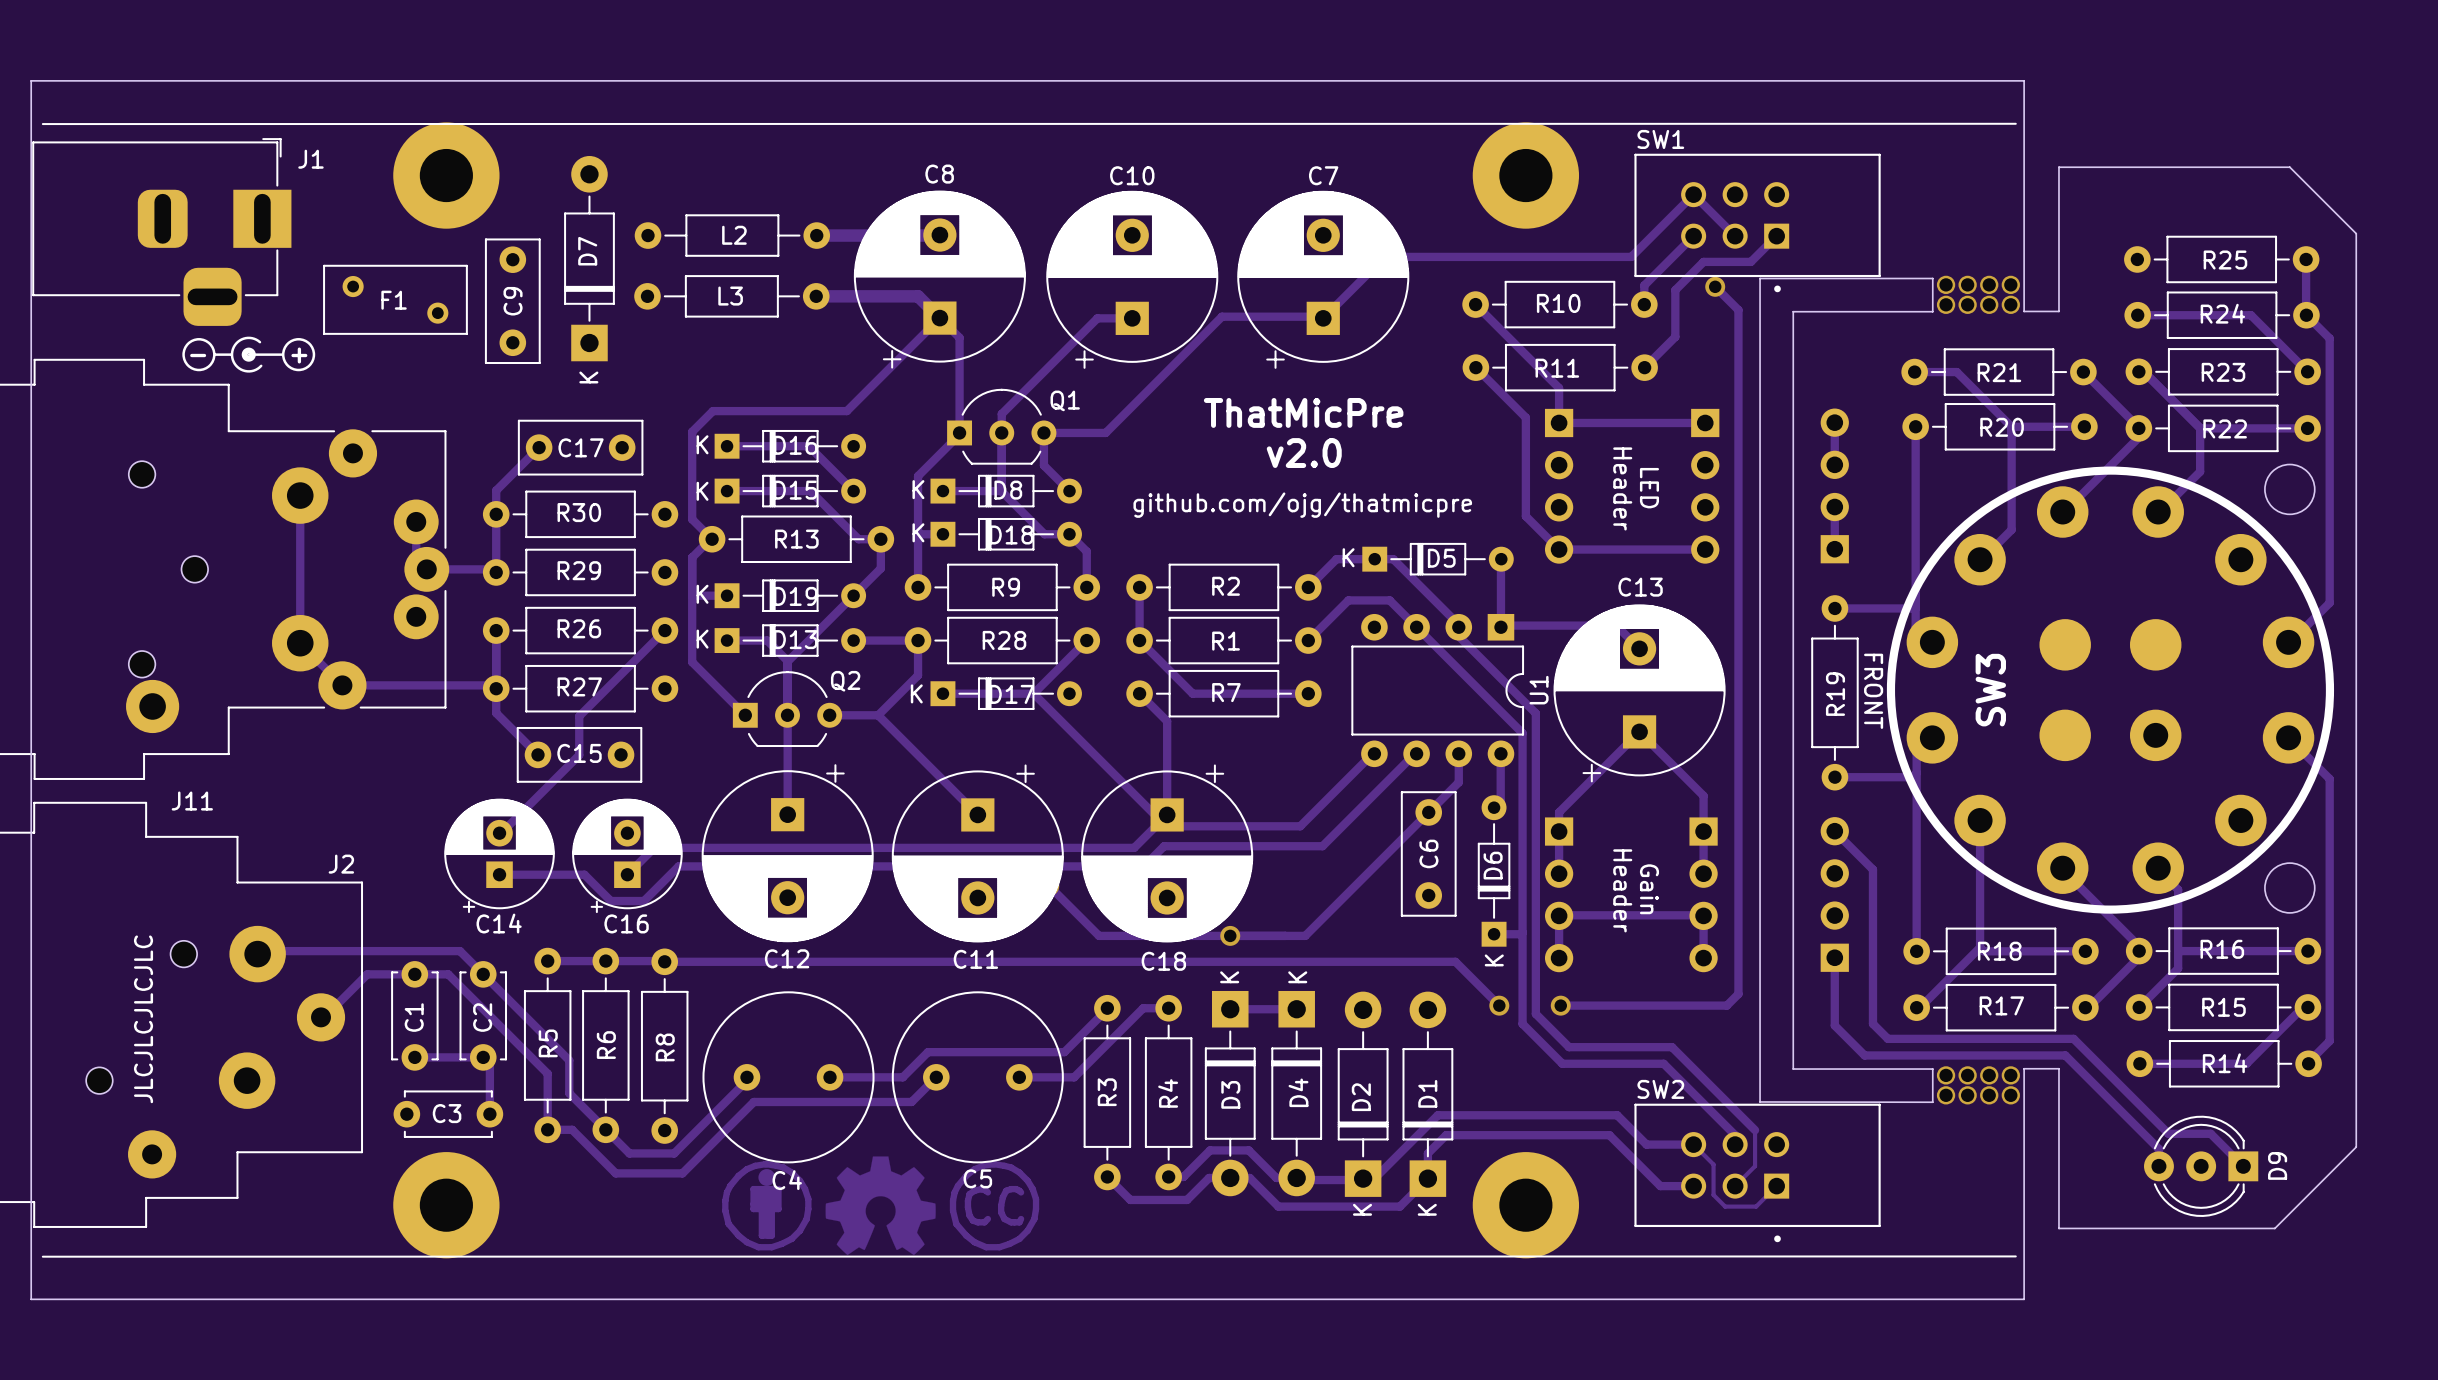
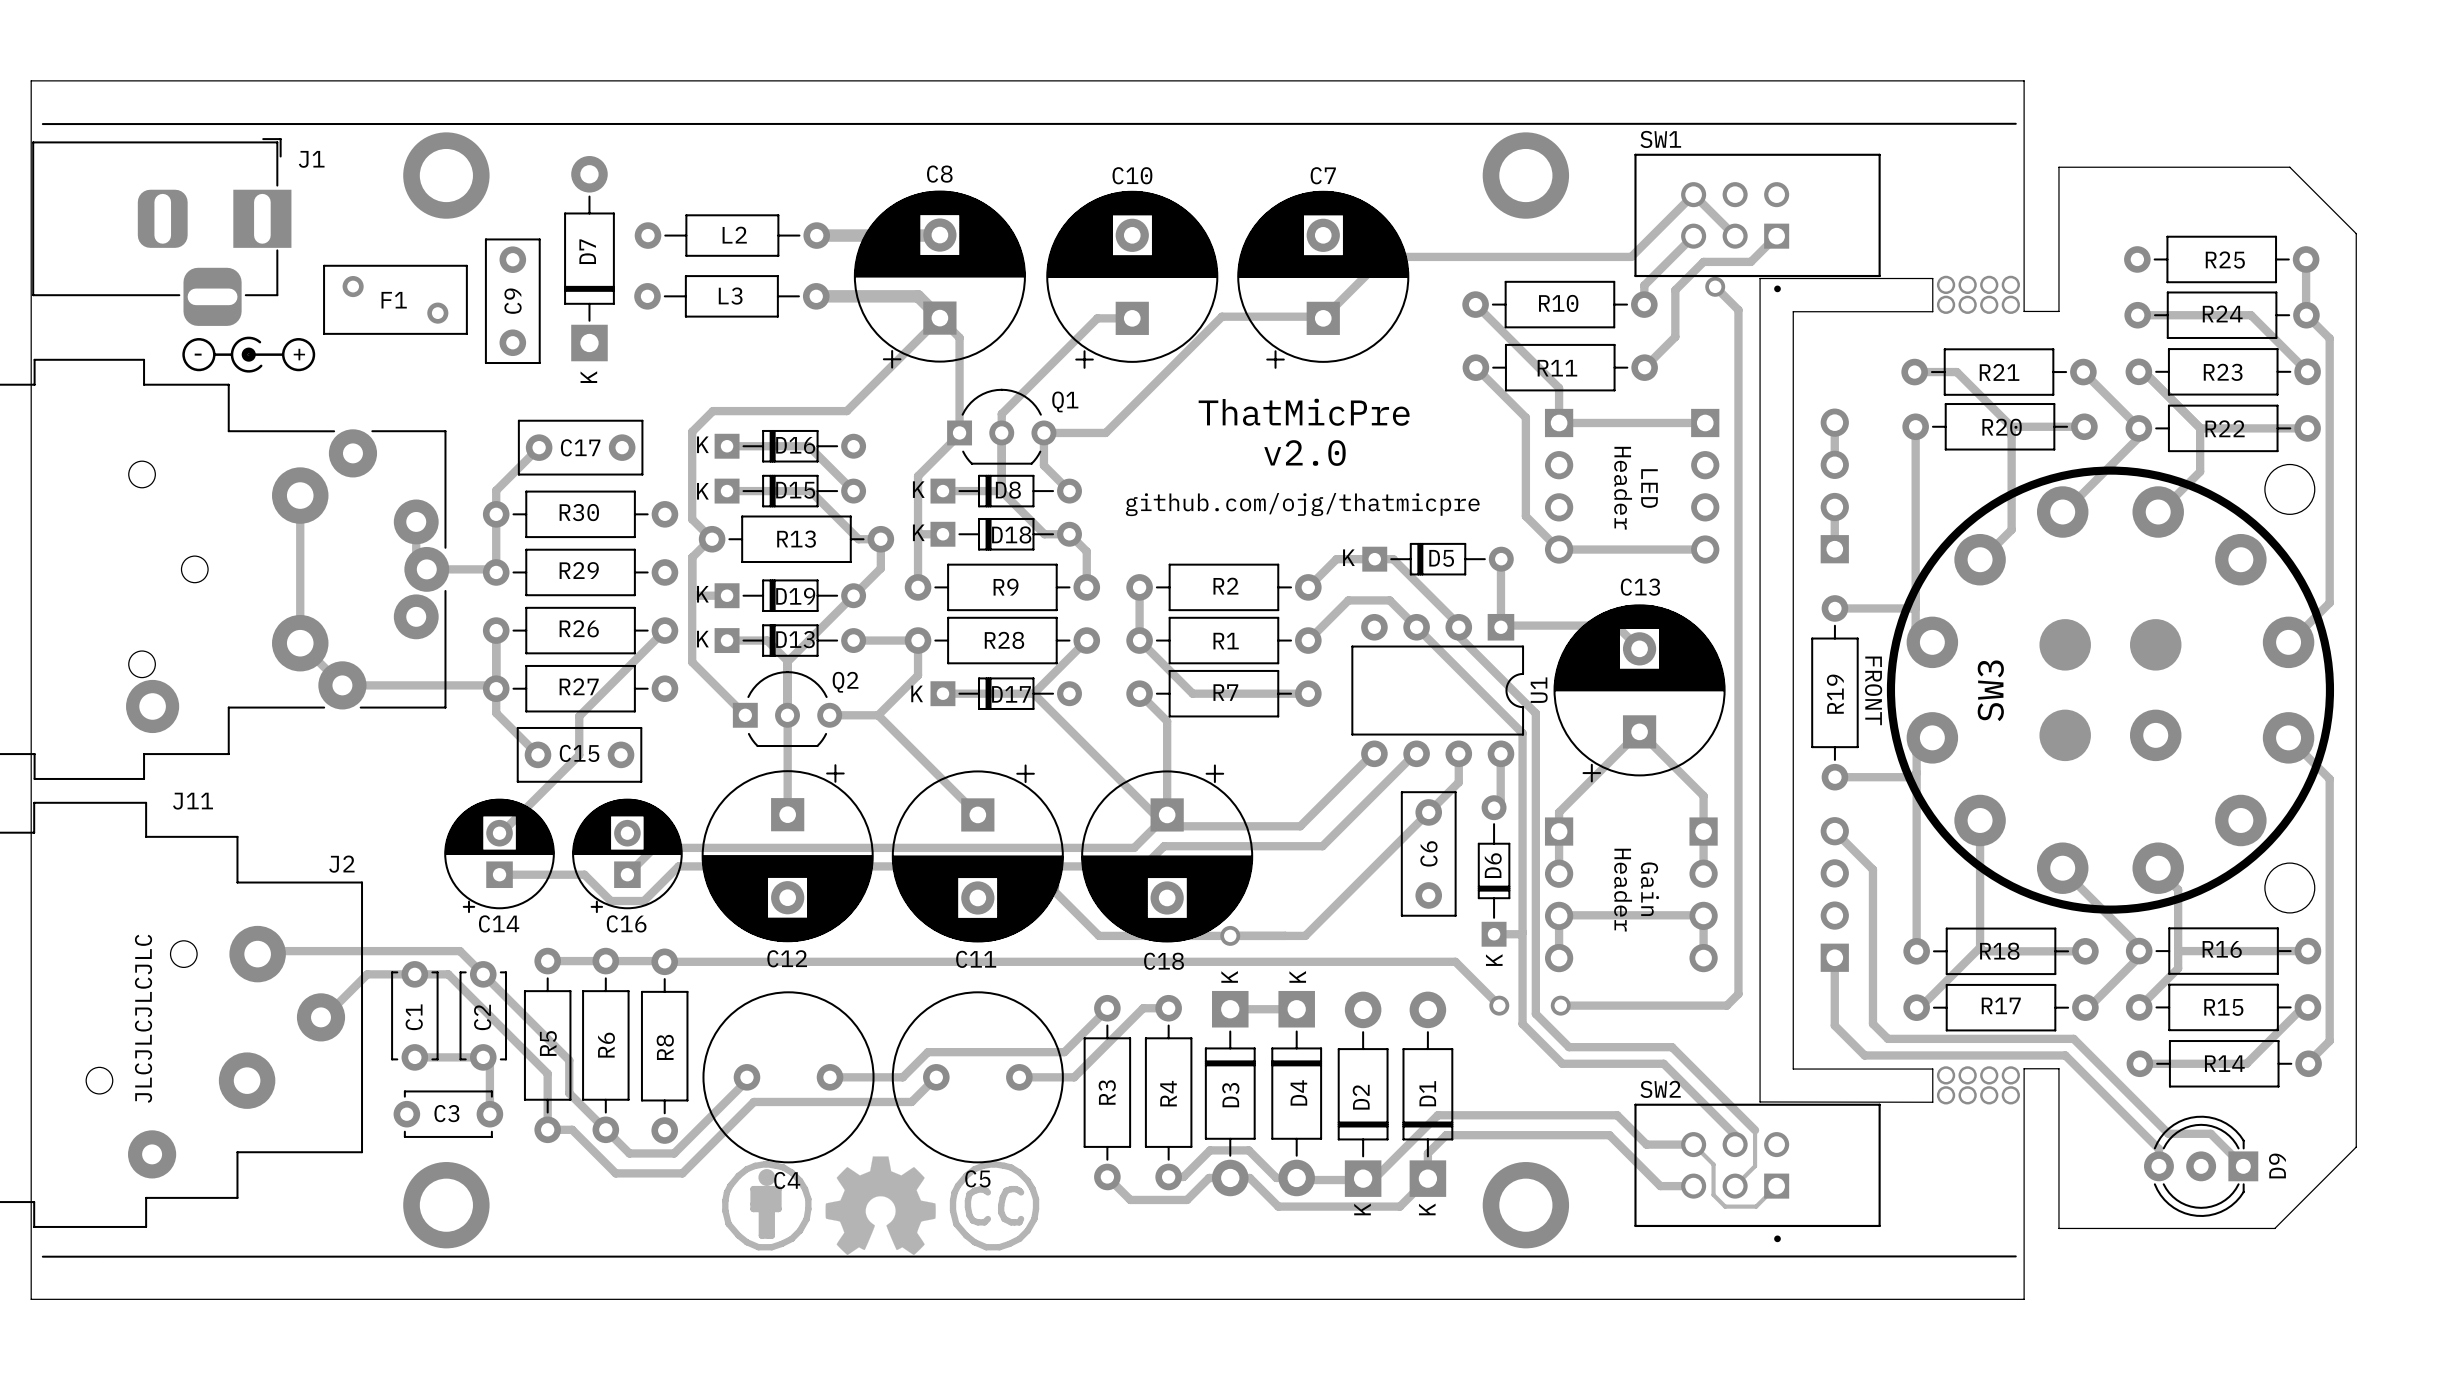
part footprint: [393, 122, 500, 229] -> [403, 132, 490, 219]
part footprint: [1472, 122, 1580, 229] -> [1482, 132, 1570, 219]
part footprint: [393, 1152, 500, 1259] -> [403, 1162, 490, 1249]
part footprint: [1472, 1152, 1580, 1259] -> [1482, 1162, 1570, 1249]

